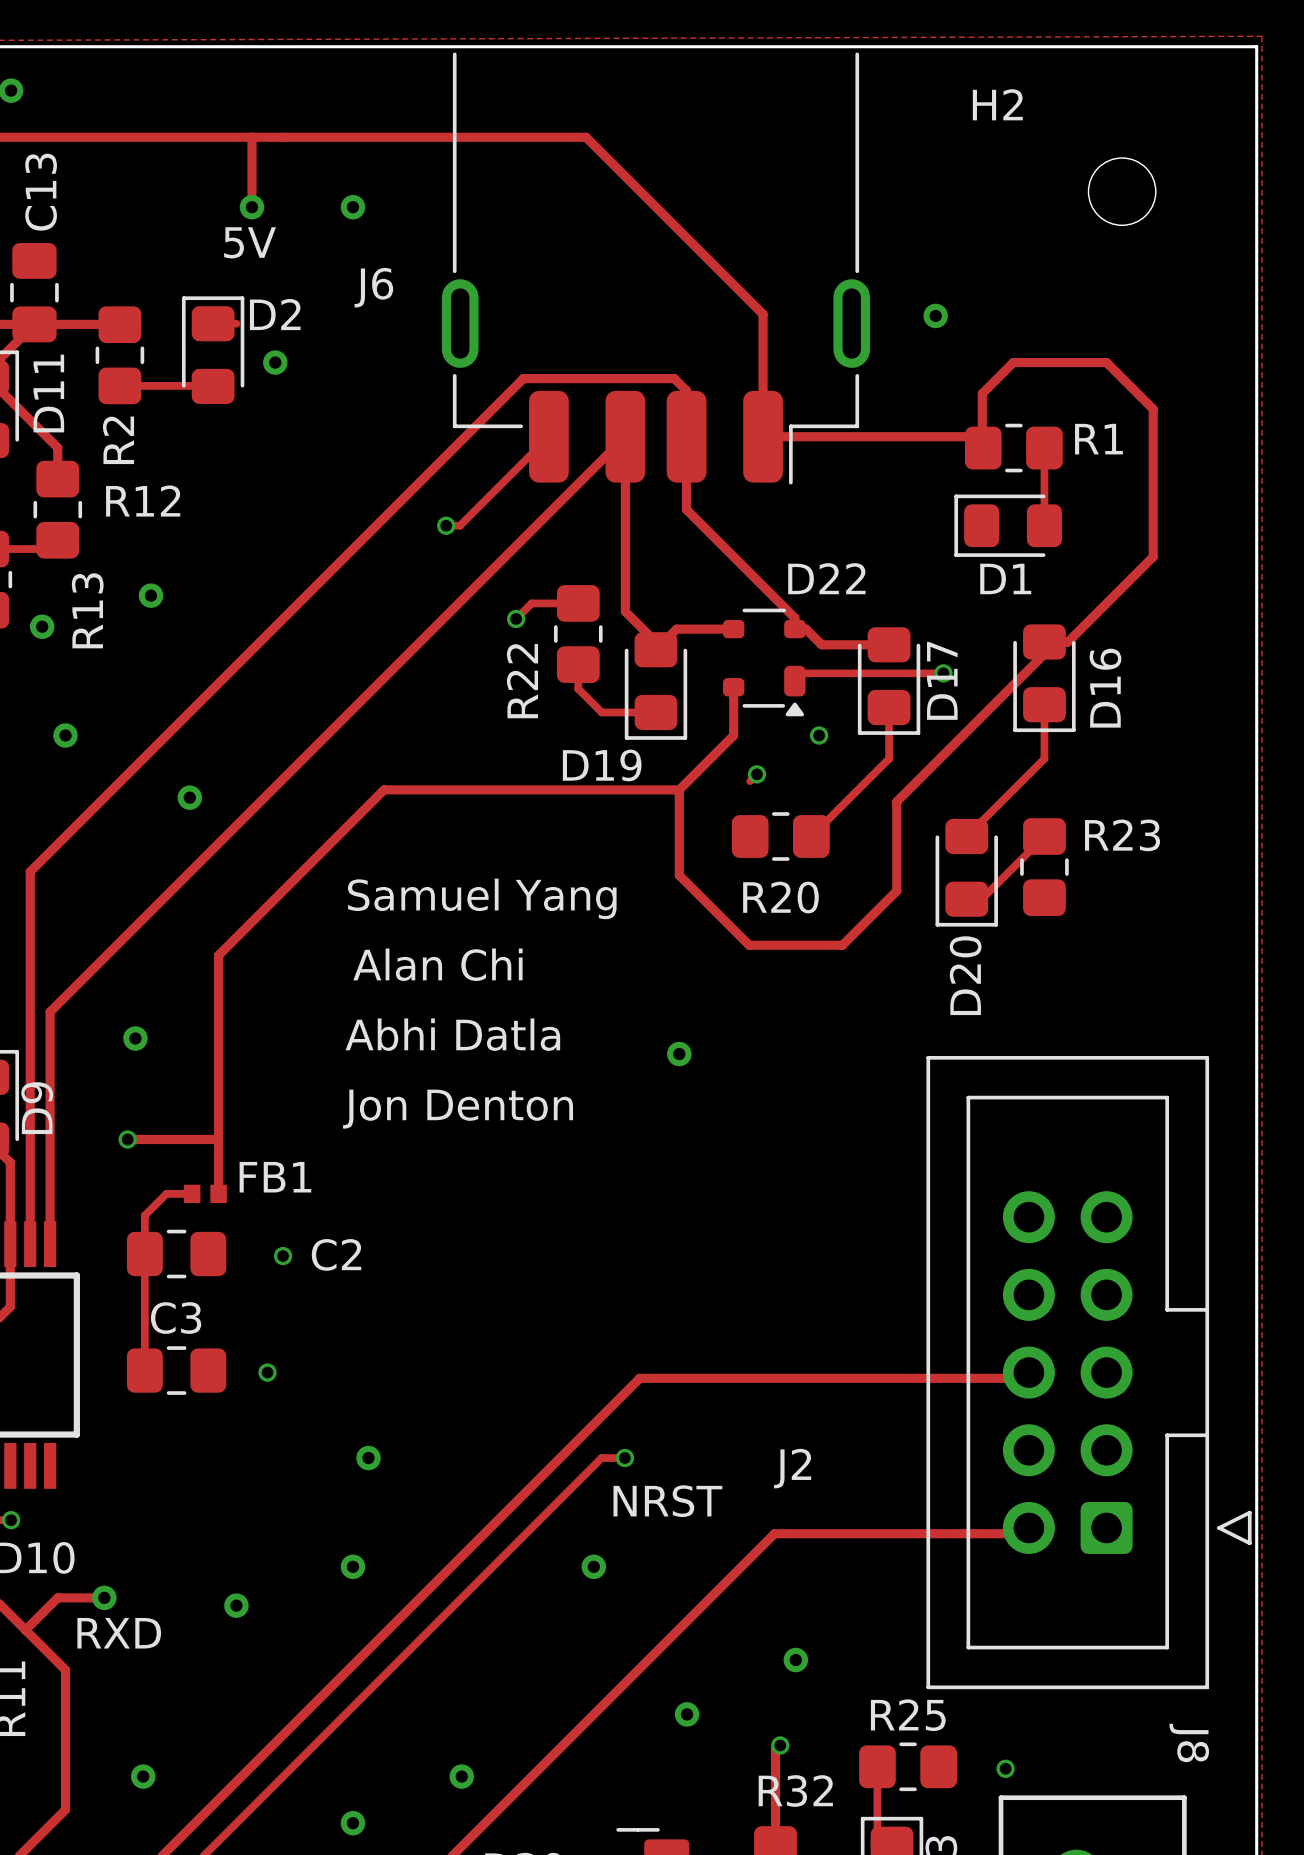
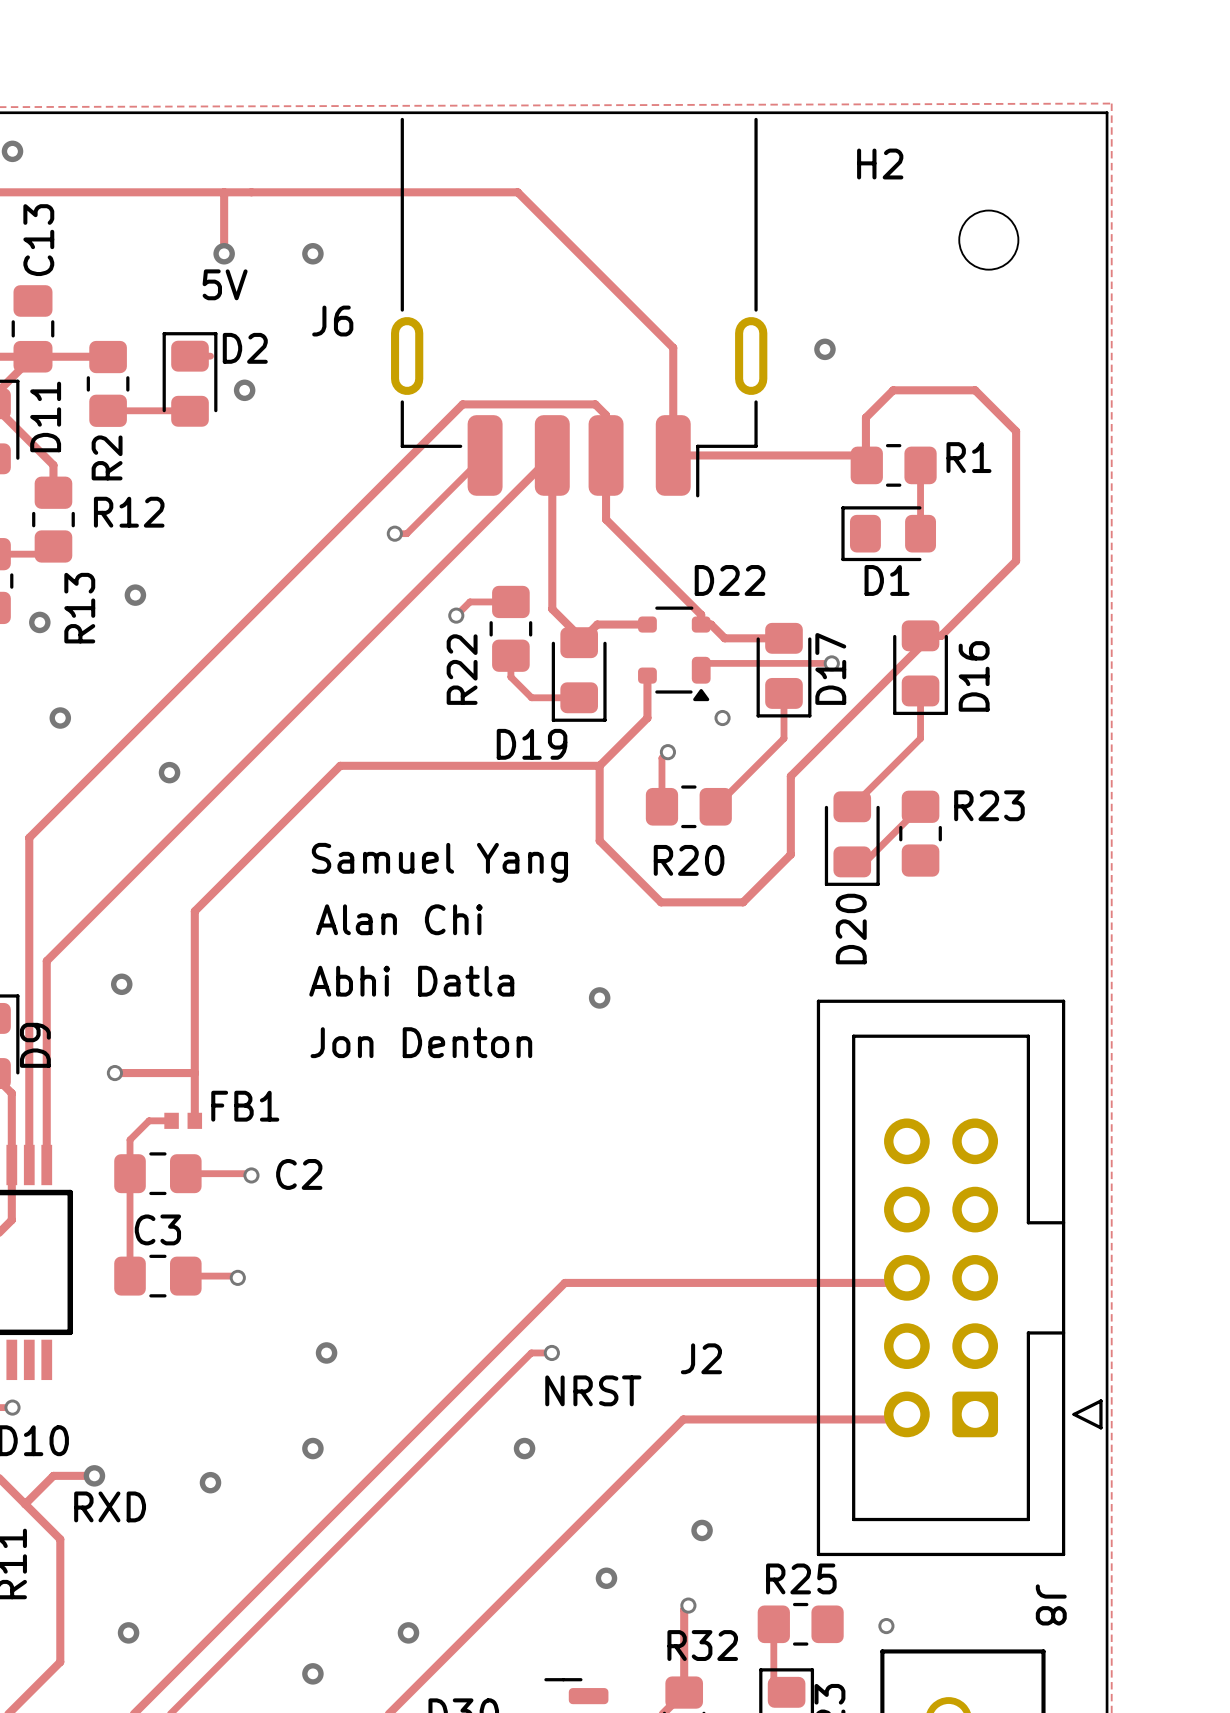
track: none -> (661, 758) (661, 806)
track: none -> (185, 1173) (249, 1173)
track: none -> (185, 1276) (236, 1276)

